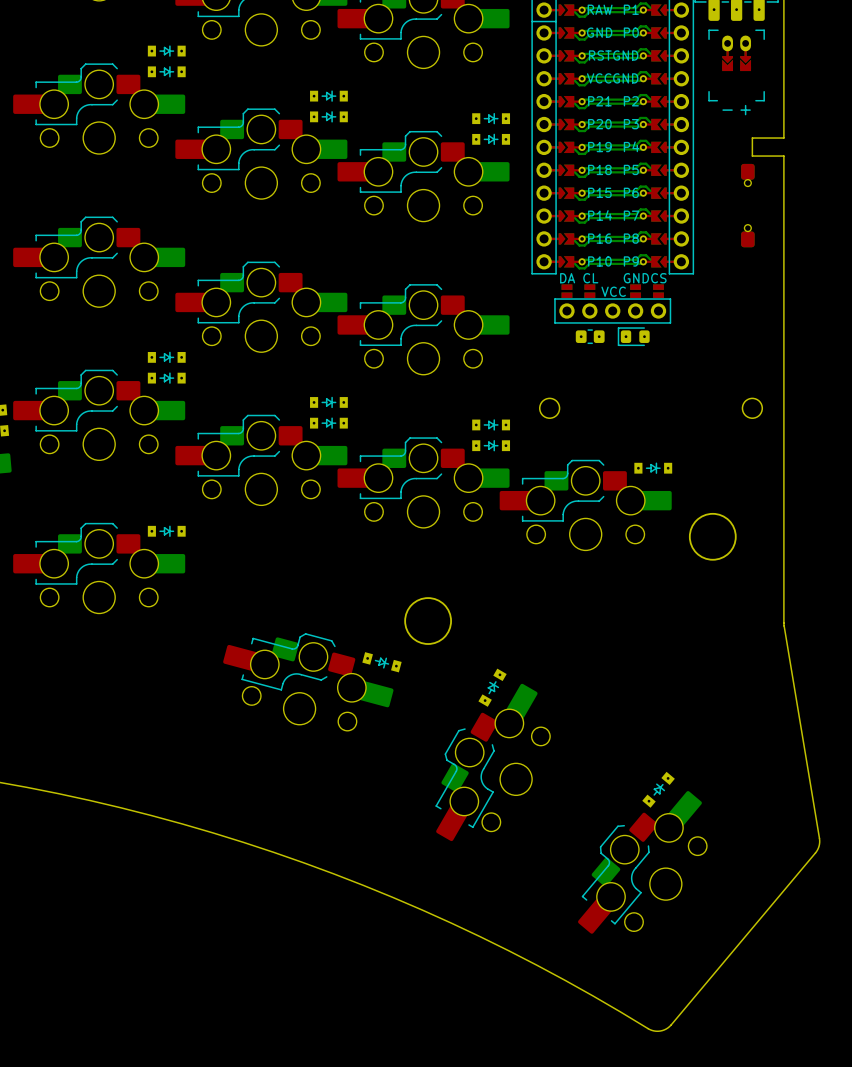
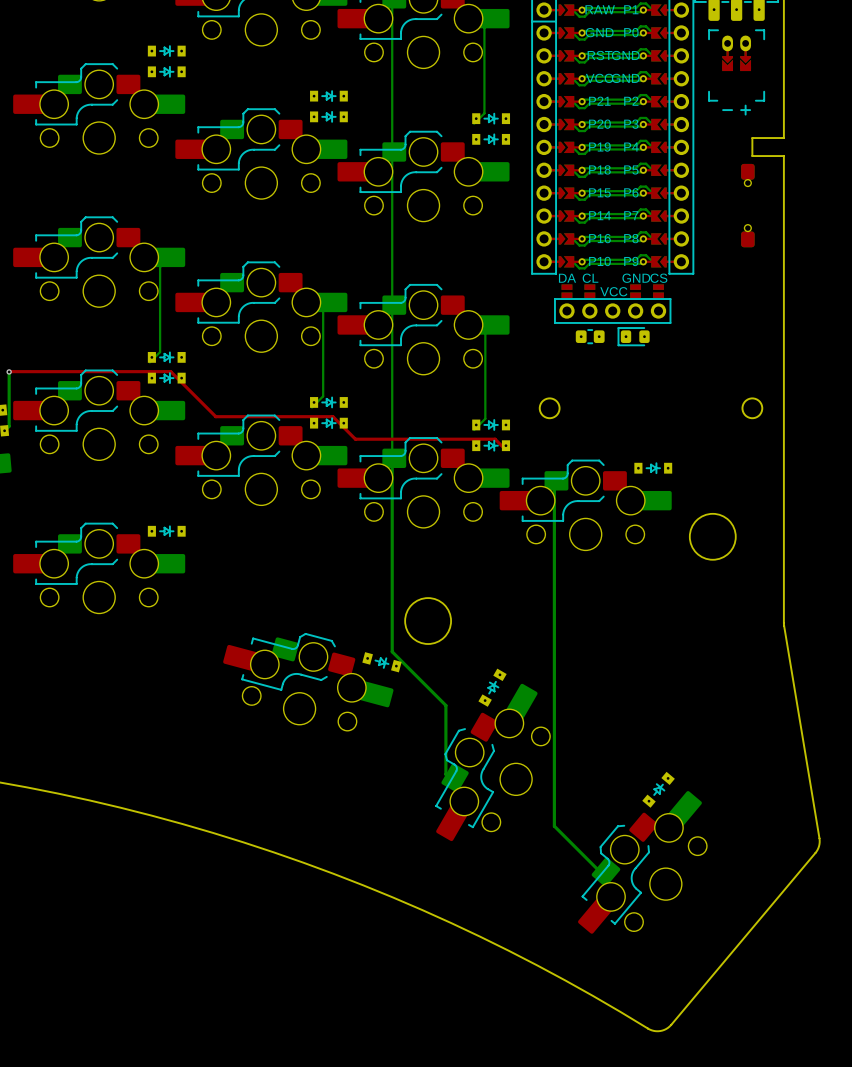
bottom track: none -> (392, 2) (392, 651) (445, 705) (445, 774) (453, 781)
bottom track: none -> (490, 22) (484, 28) (484, 113) (474, 123)
bottom track: none -> (166, 261) (160, 266) (160, 352) (149, 362)
bottom track: none -> (328, 306) (323, 311) (323, 396) (311, 407)
bottom track: none -> (490, 328) (485, 333) (485, 418) (474, 429)
top track: none -> (9, 371) (170, 371) (215, 416) (332, 416) (355, 439) (495, 439) (503, 447)
bottom track: none -> (9, 371) (9, 426) (2, 433)
via: none -> (9, 371)
bottom track: none -> (554, 484) (554, 826) (603, 875)

